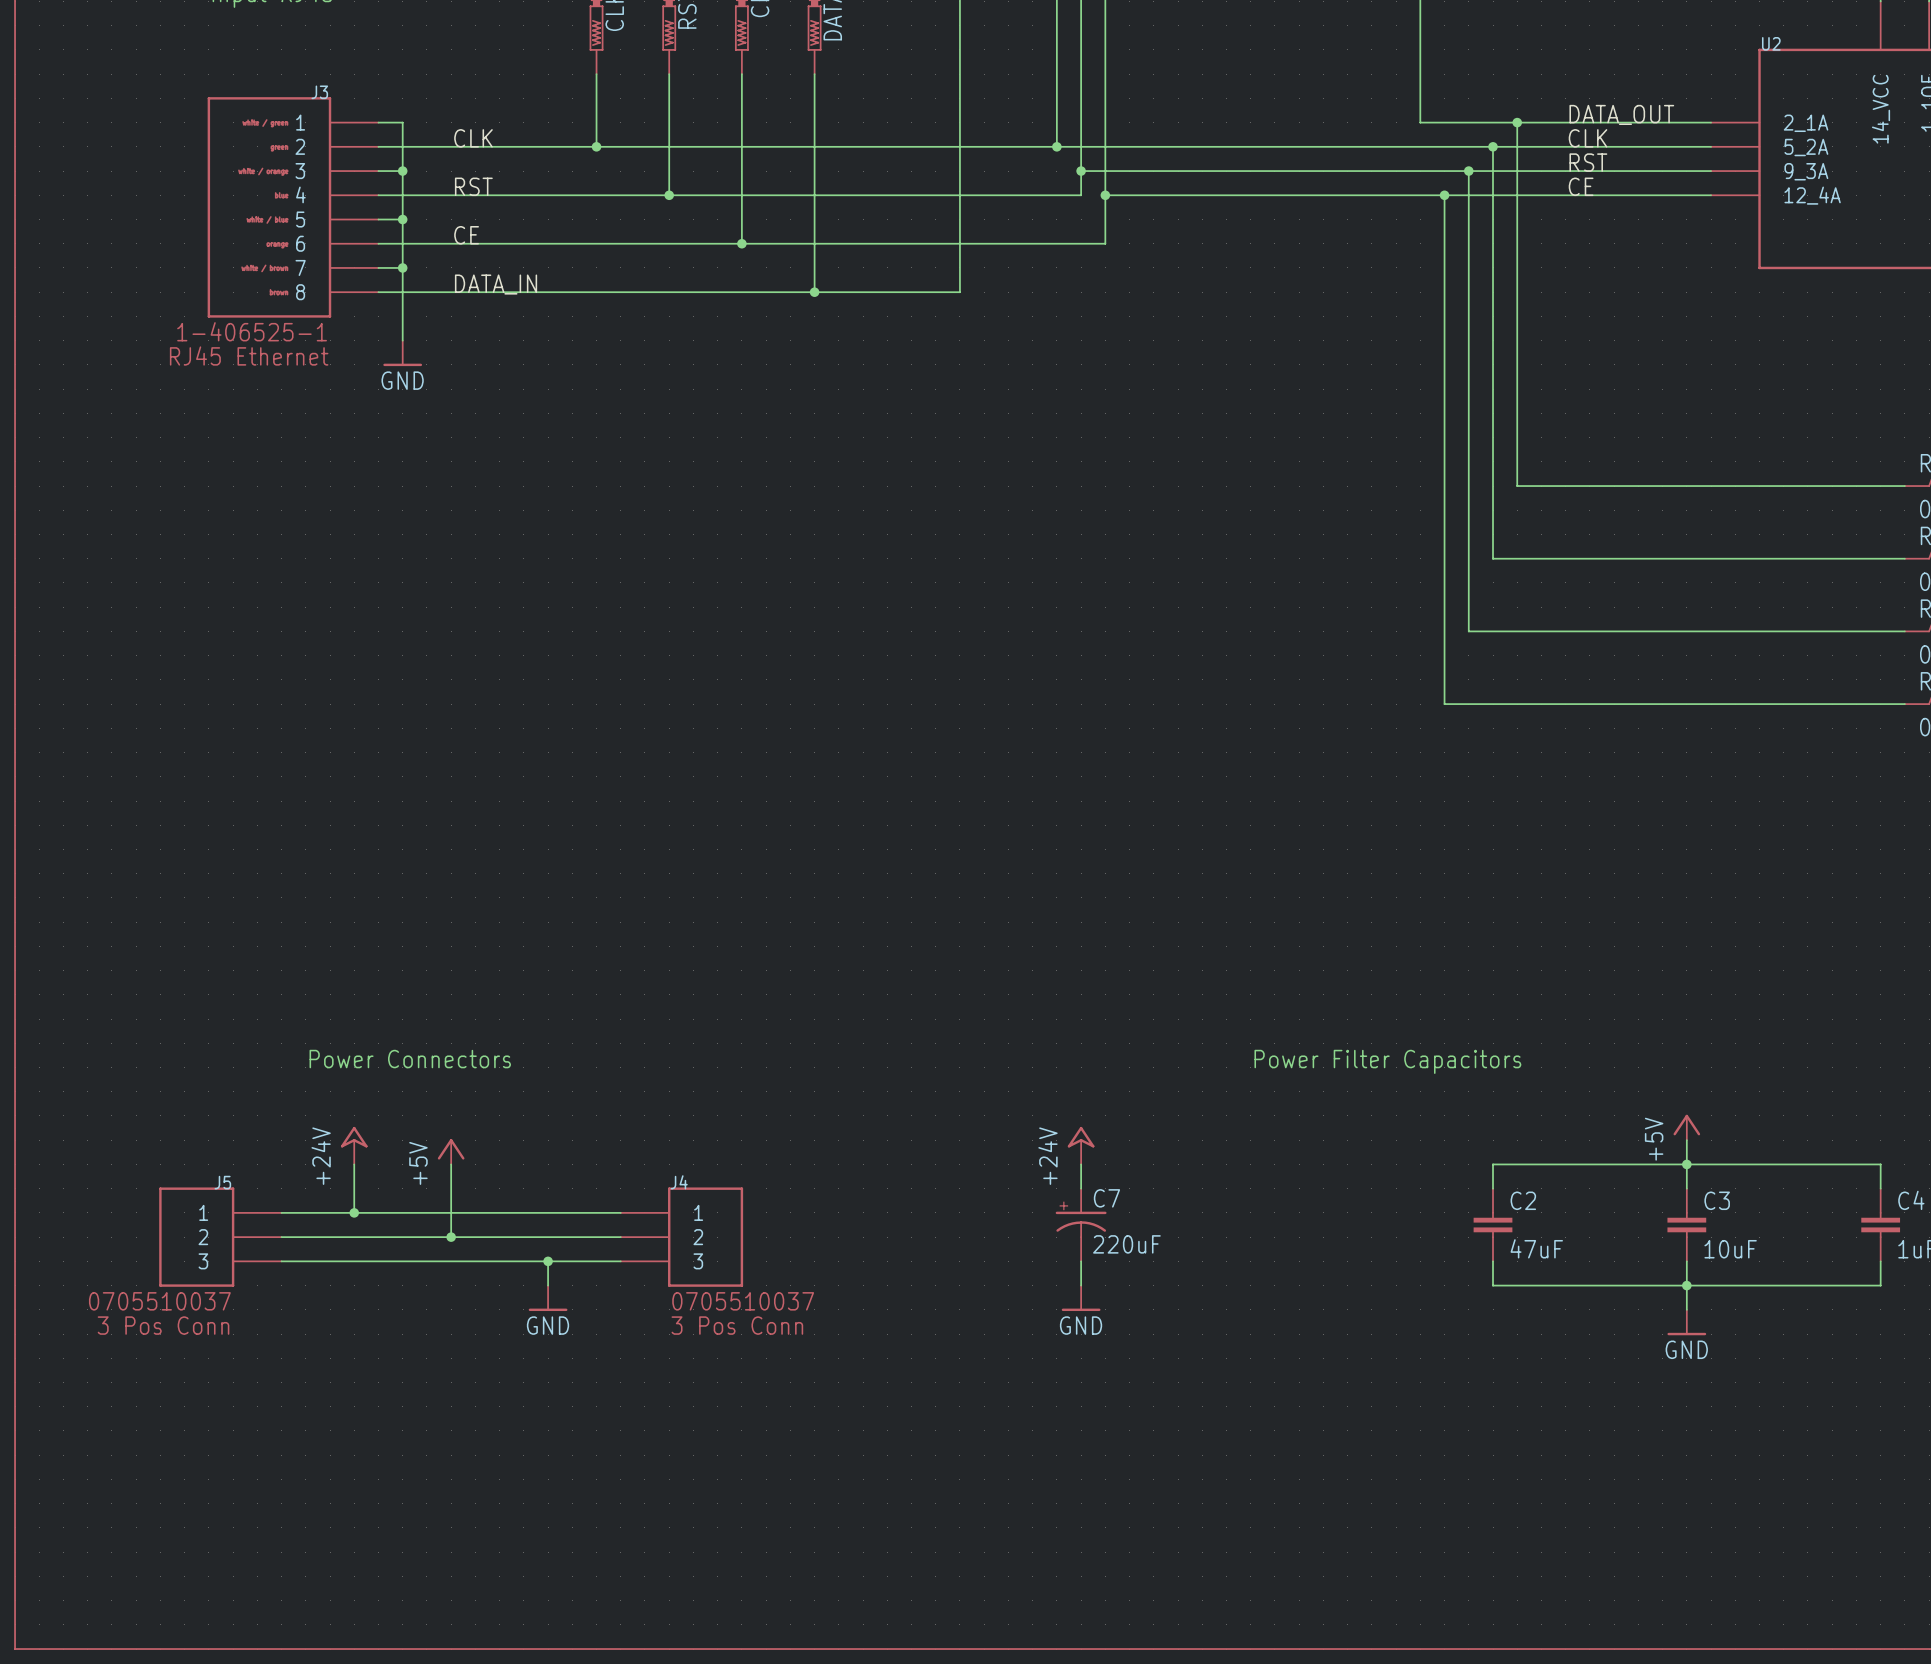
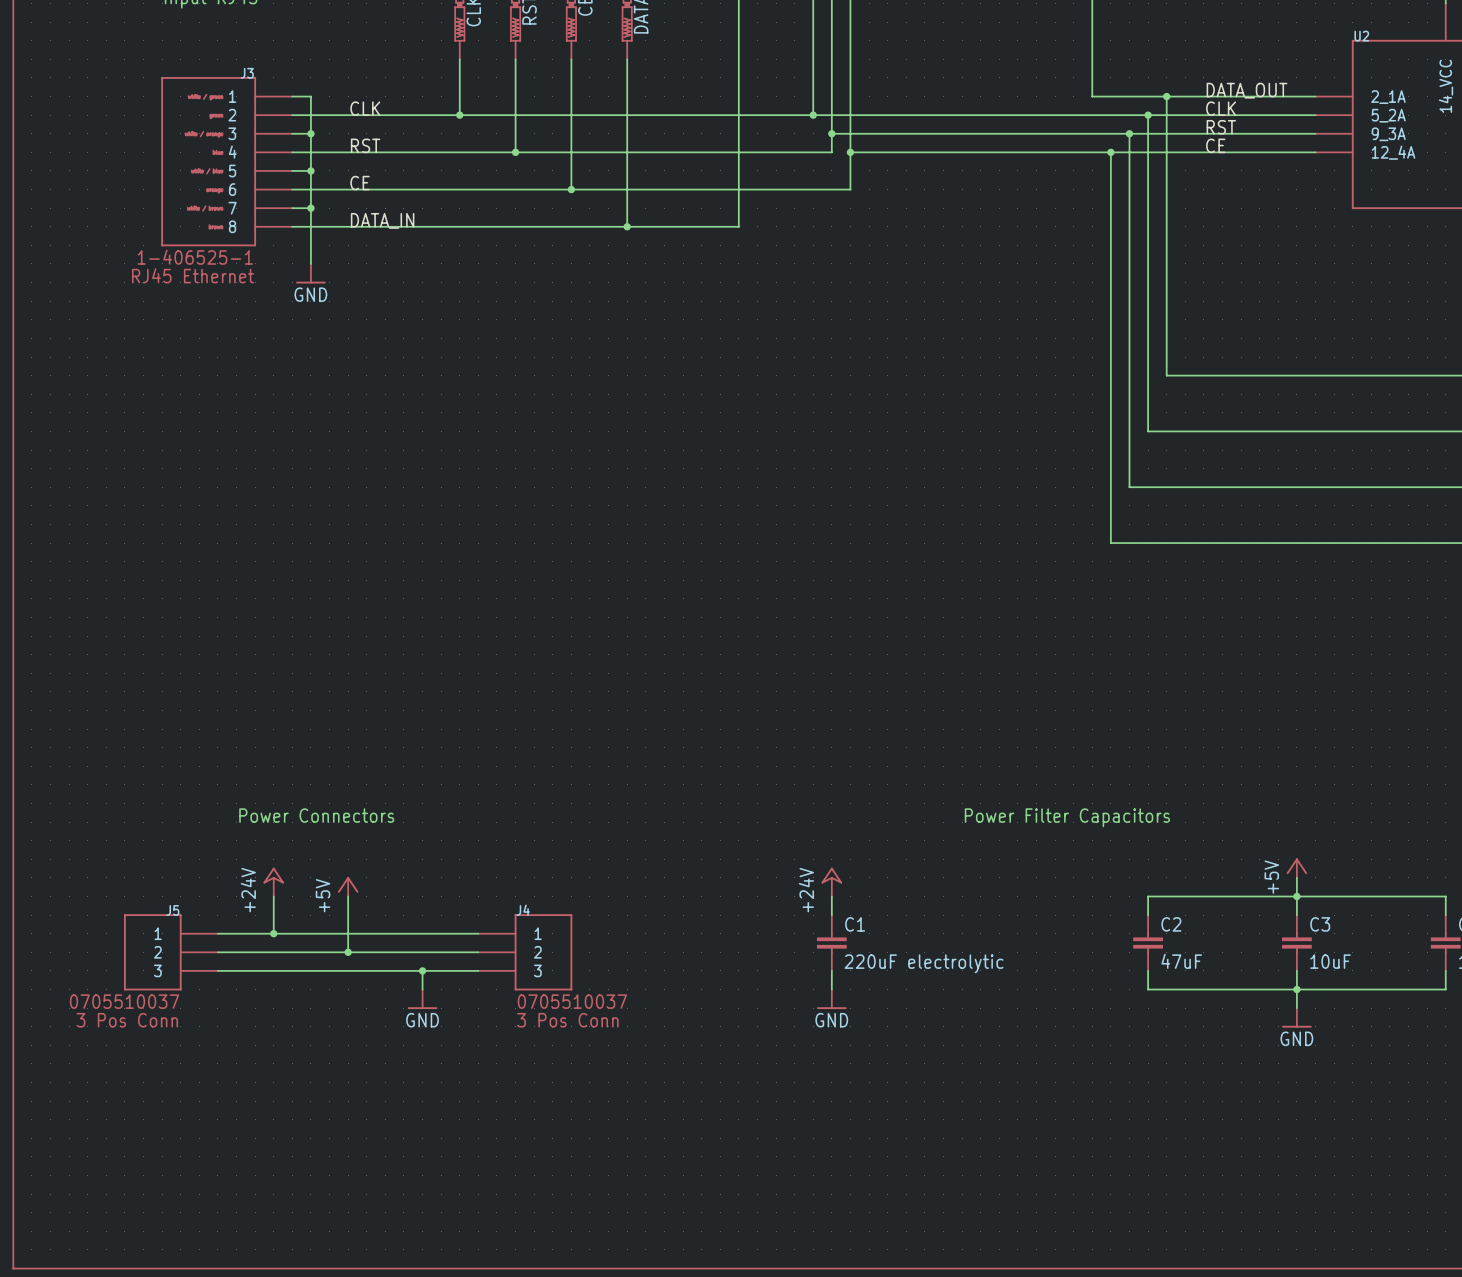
C7: 220uF (1081, 1225) -> none
C1: none -> 220uF electrolytic (831, 943)

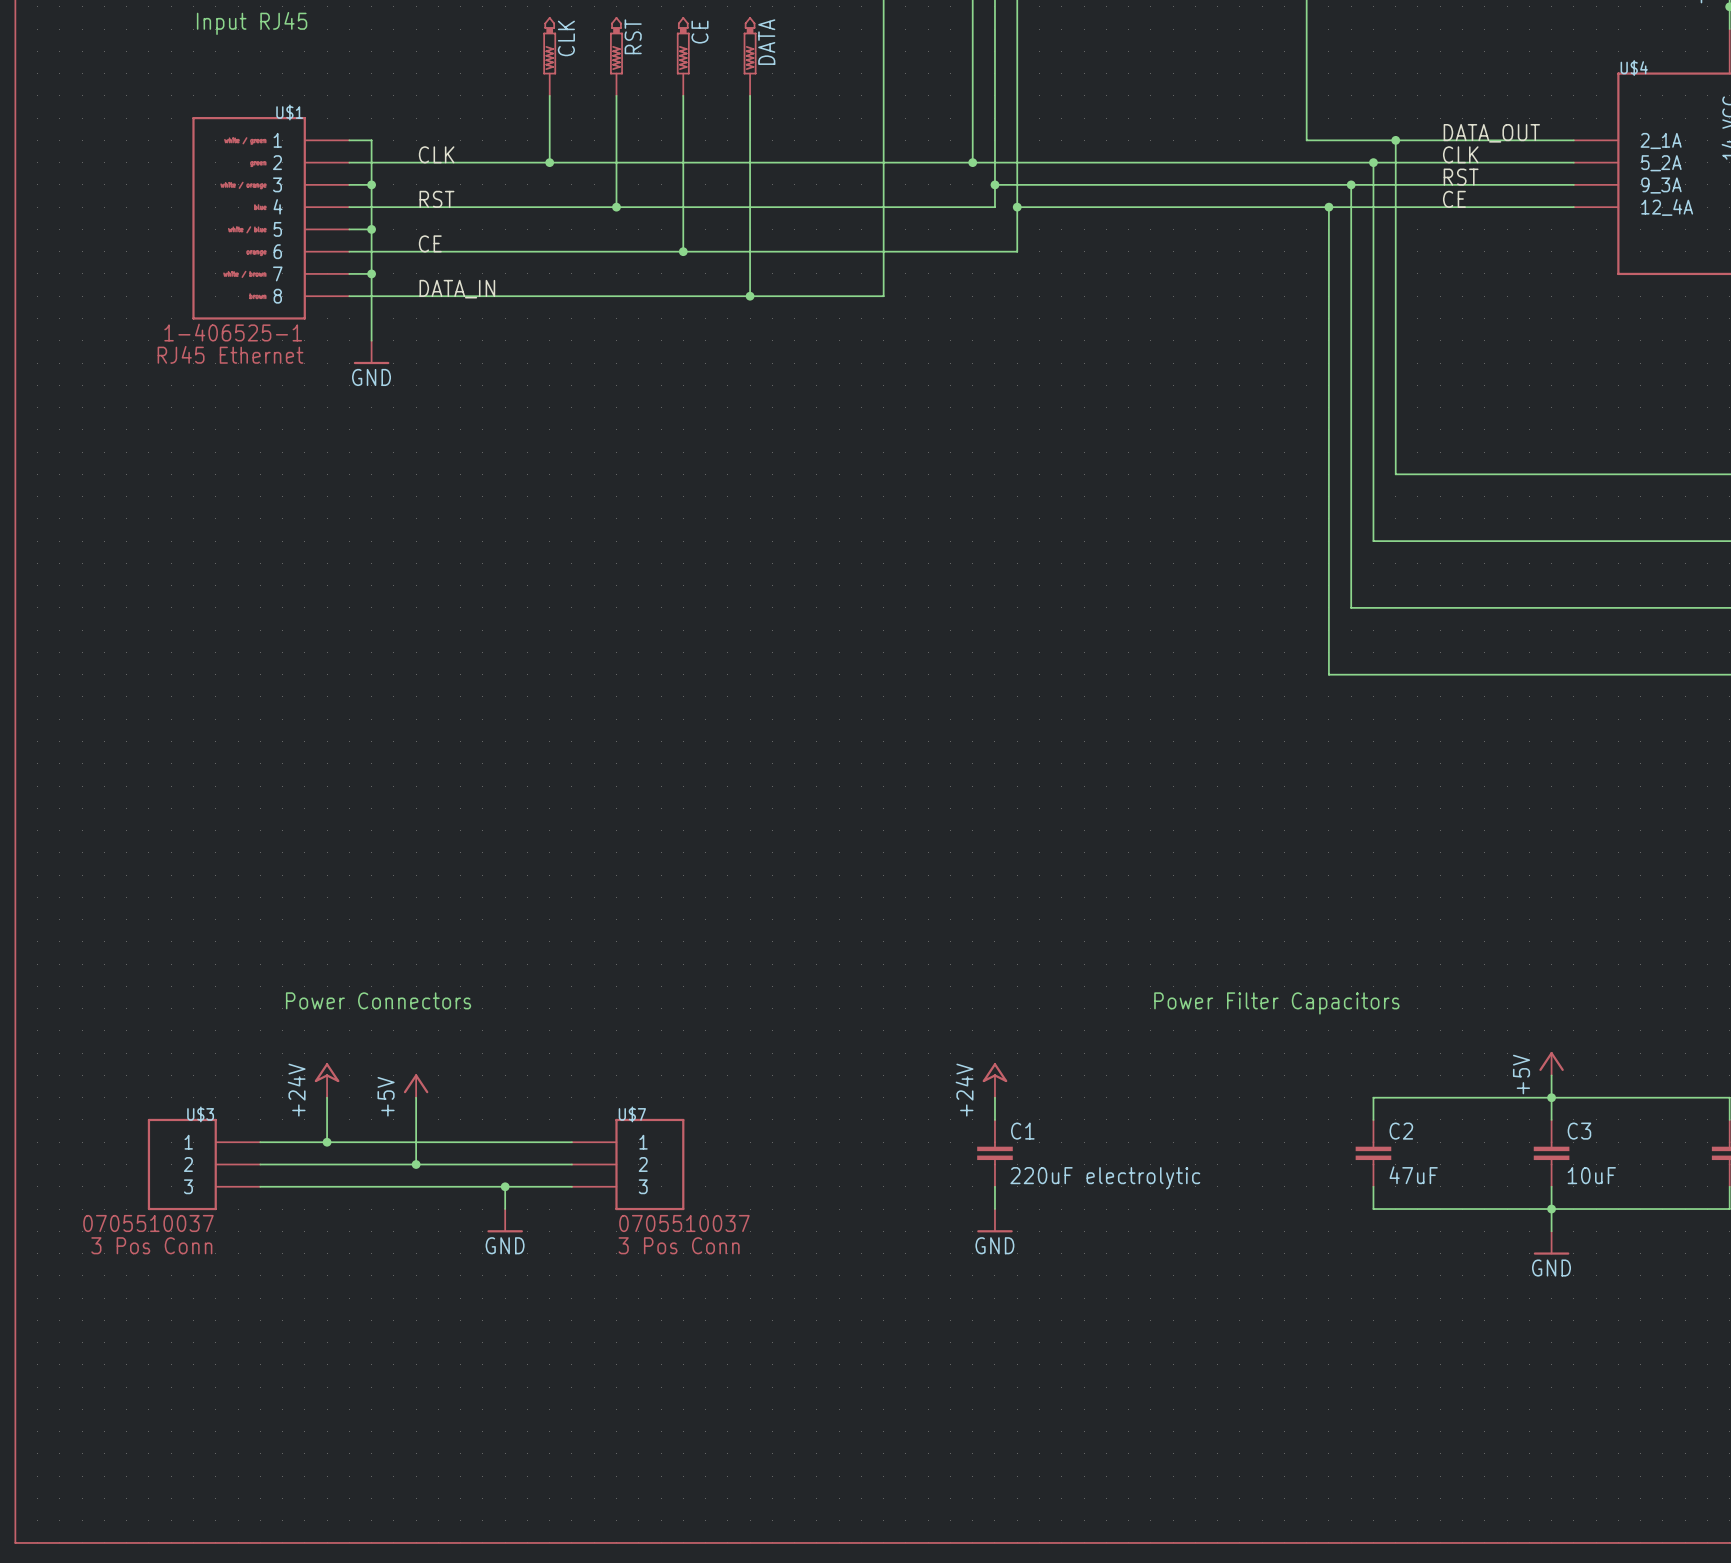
U2 name: U2 (1361, 36) -> U$4 (1634, 68)
J3 name: J3 (247, 73) -> U$1 (289, 112)
J5 name: J5 (172, 910) -> U$3 (200, 1114)
J4 name: J4 (523, 910) -> U$7 (632, 1114)

